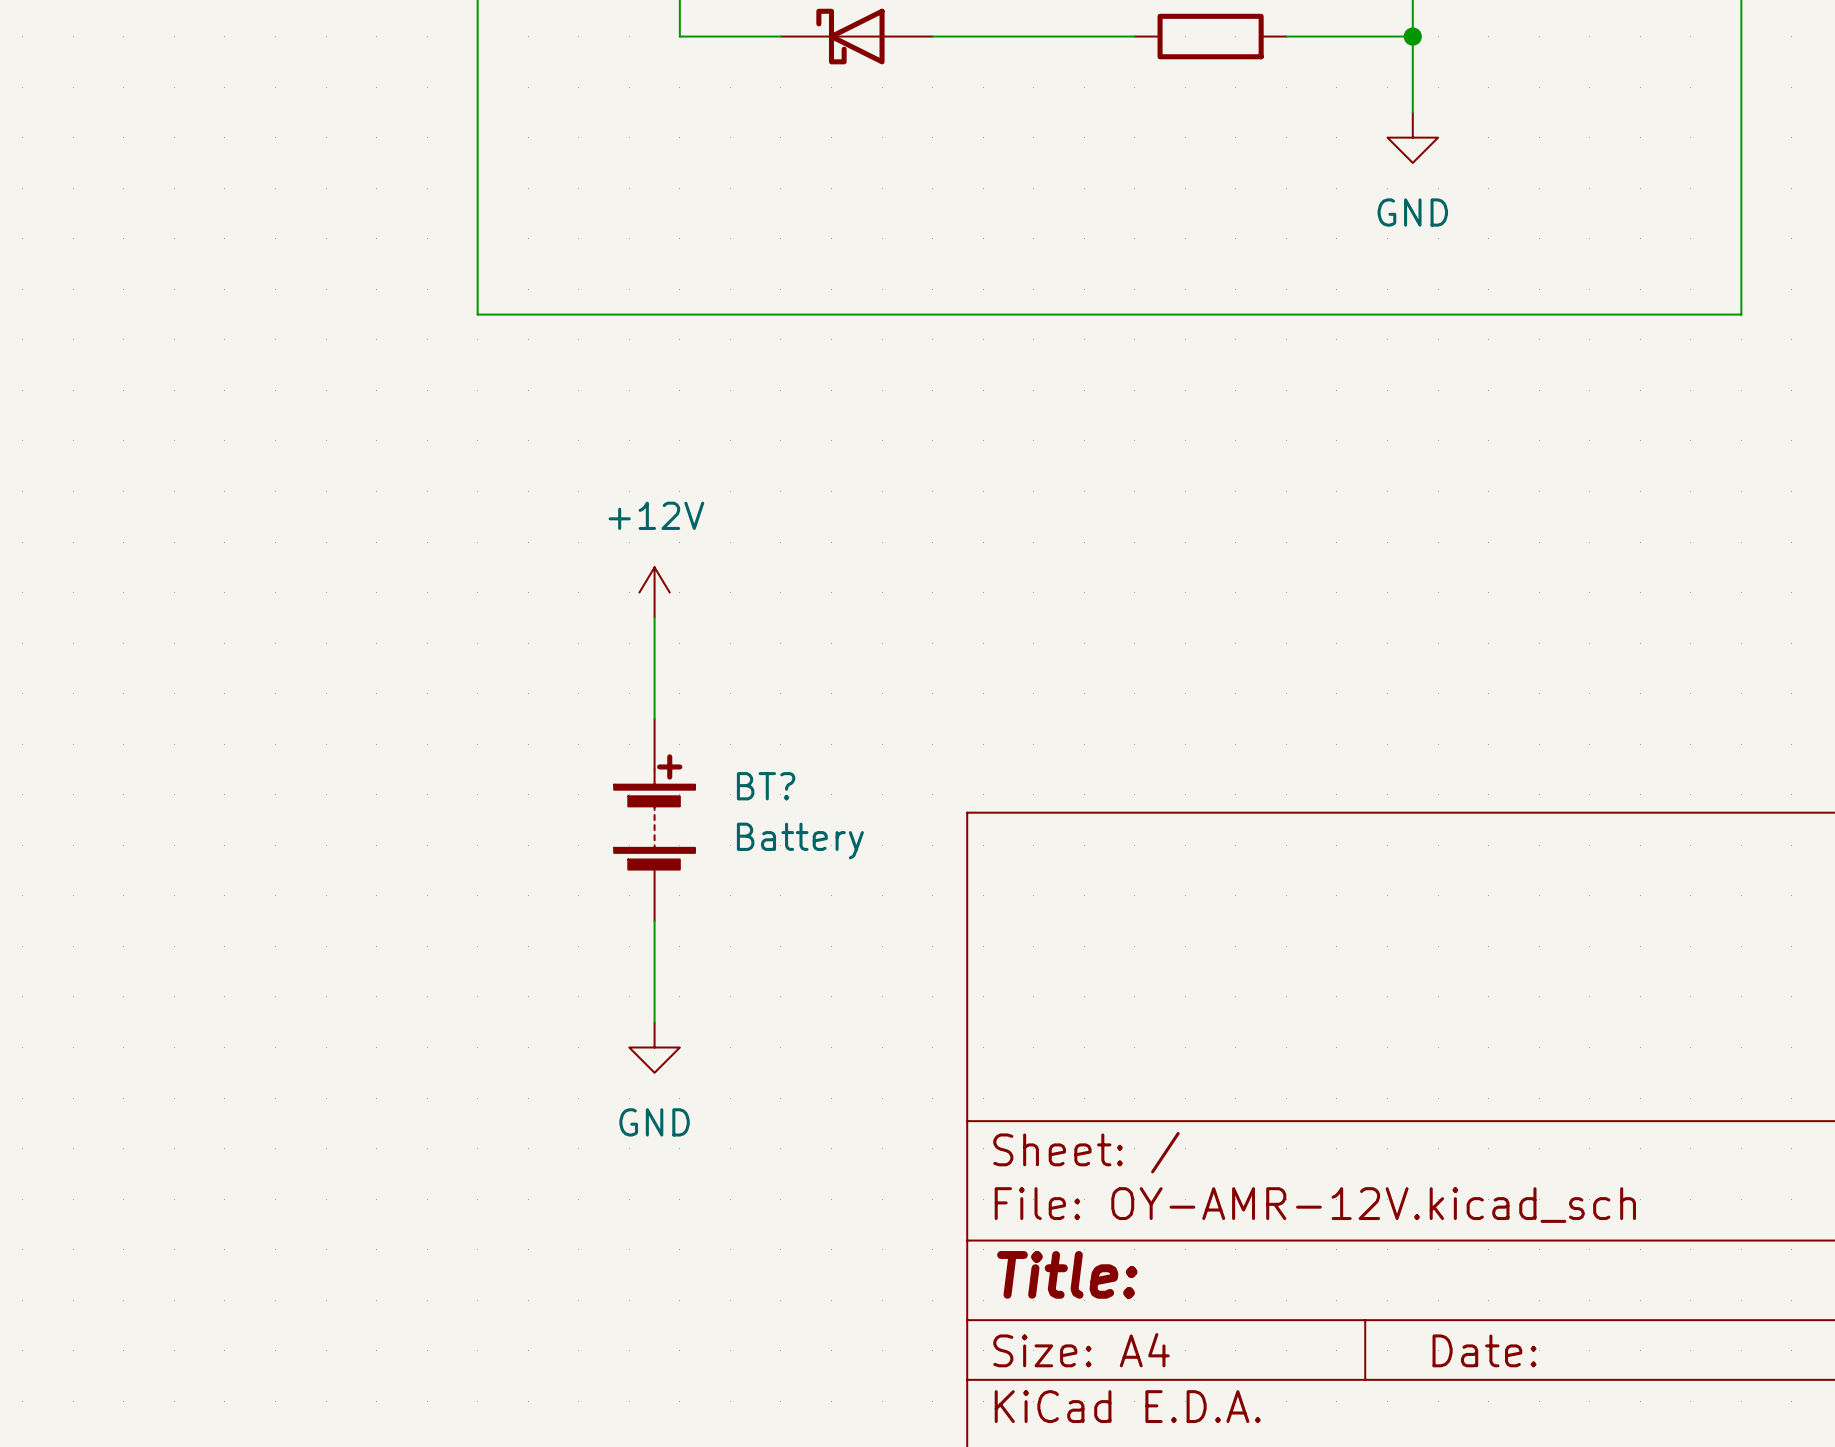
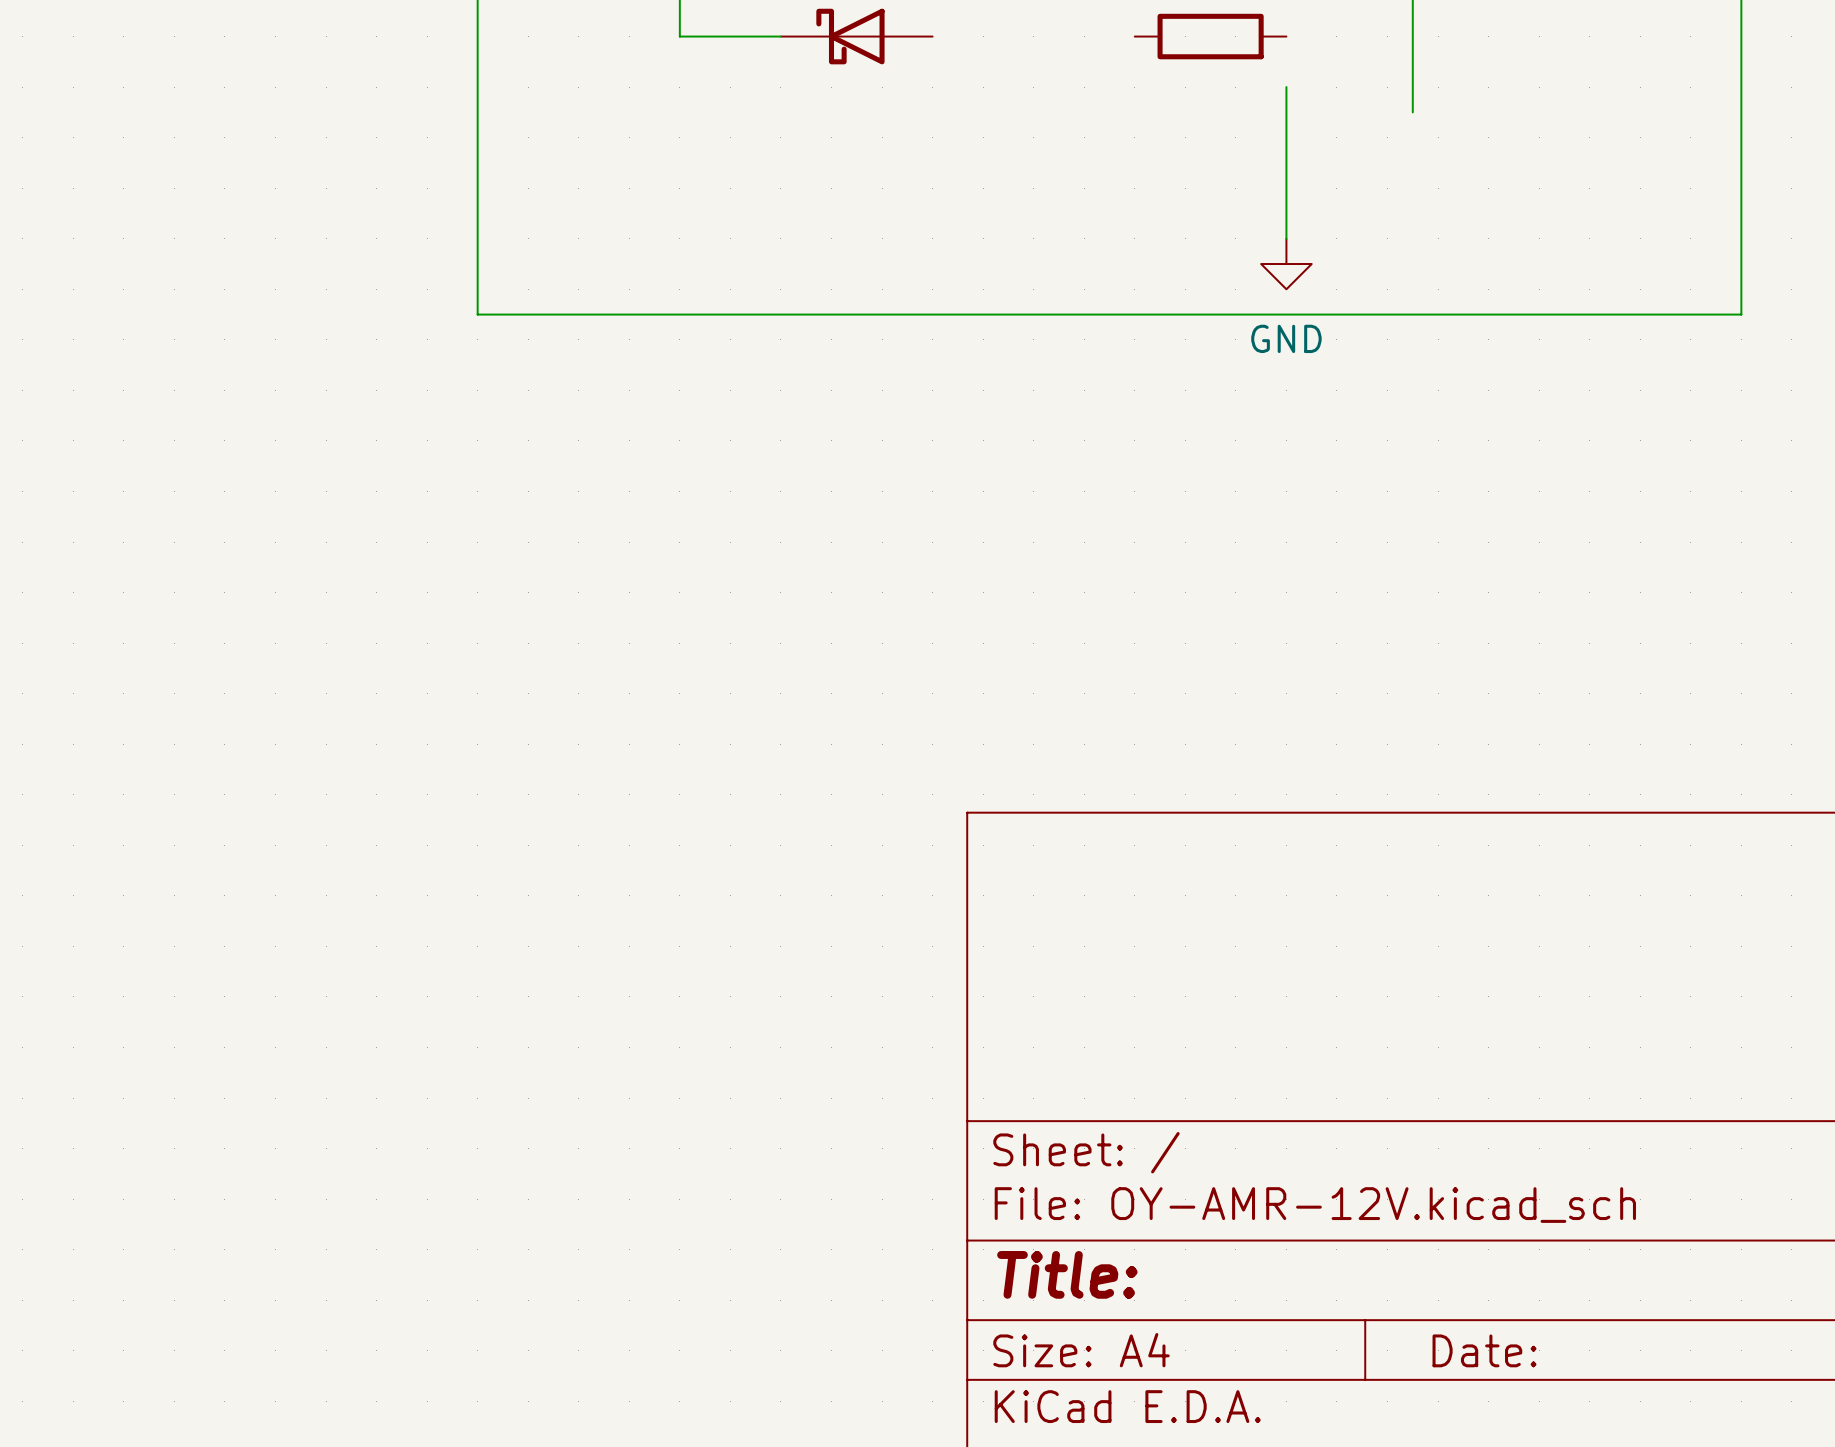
wire: (932, 36) (1134, 36) -> none
wire: (1286, 36) (1412, 36) -> none
junction: (1412, 36) -> none
wire: none -> (1286, 87) (1286, 238)
power symbol position: GND (1412, 137) -> GND (1286, 264)
power symbol: +12V (654, 592) -> none
wire: (654, 617) (654, 718) -> none
BT?: Battery (654, 820) -> none
wire: (654, 921) (654, 1022) -> none
power symbol: GND (654, 1047) -> none

